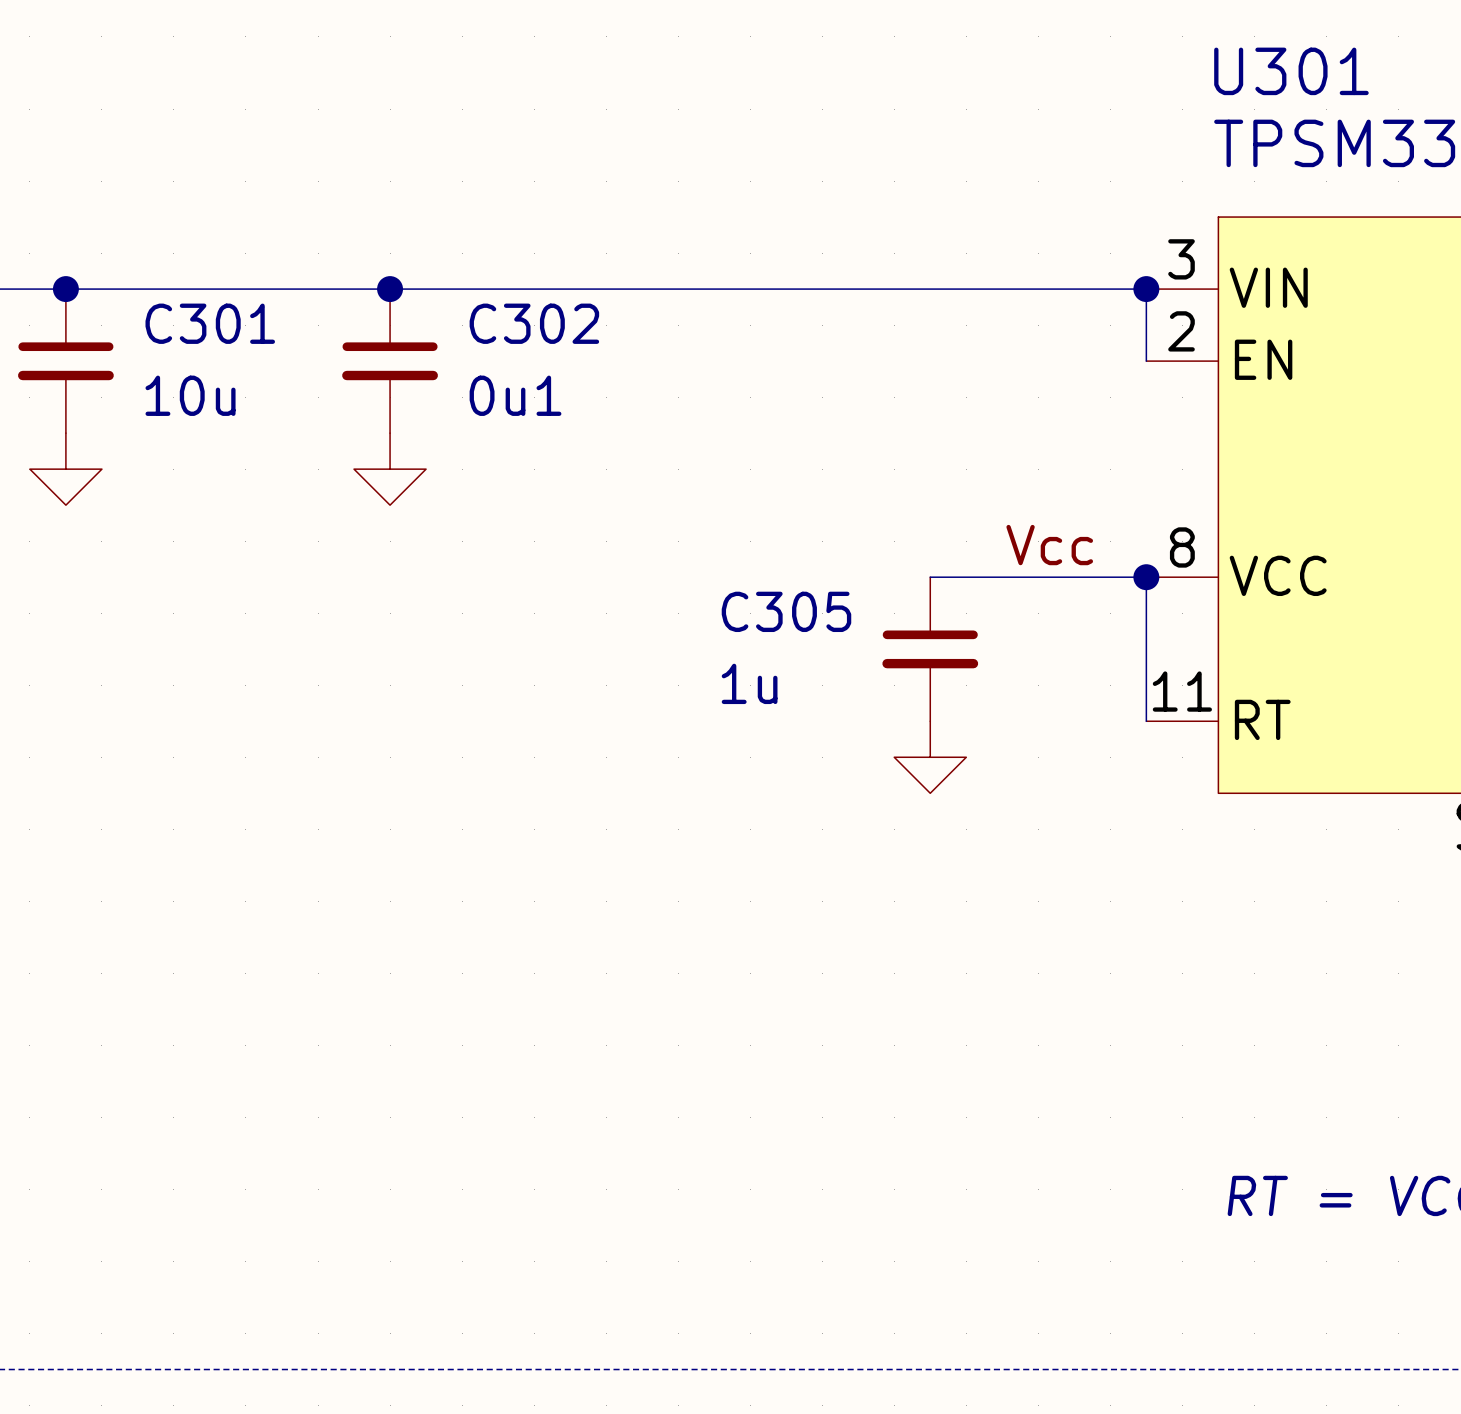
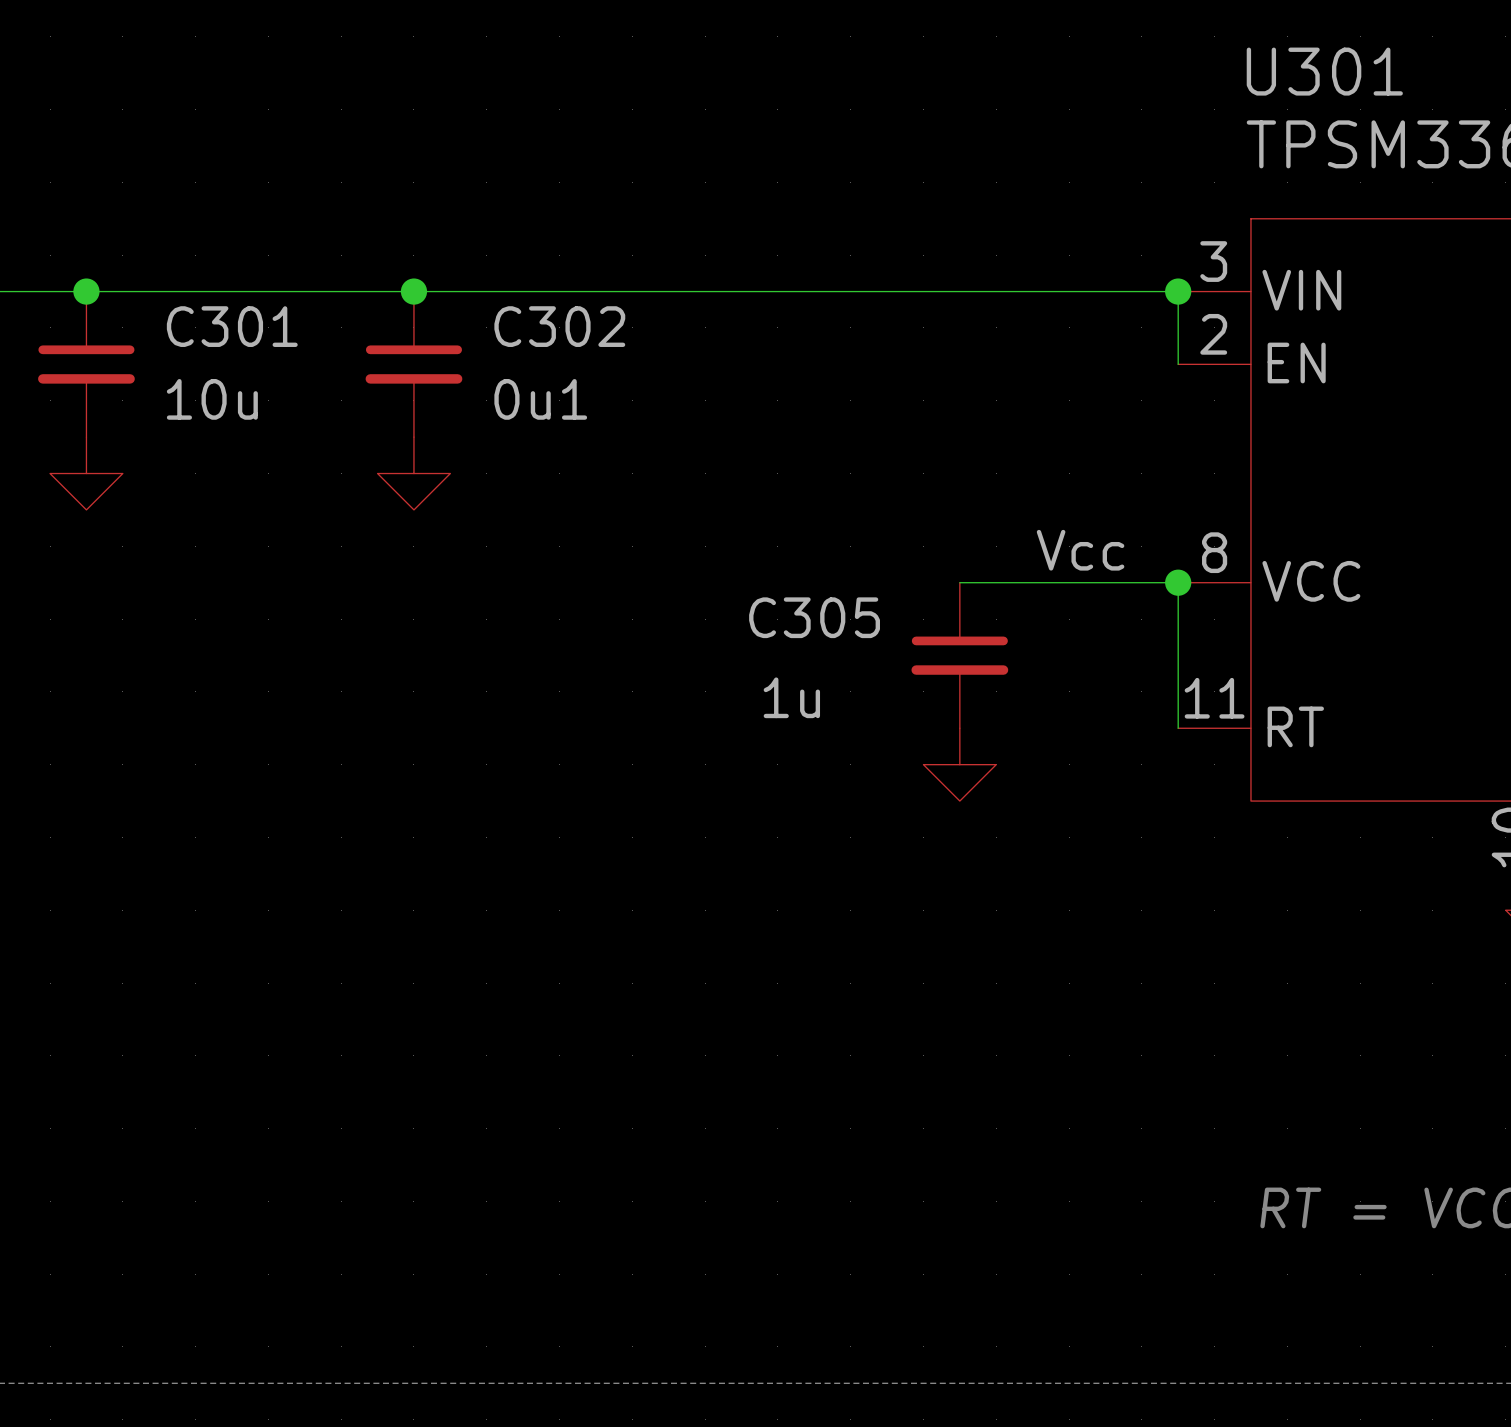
C305 value position: 1u (749, 683) -> 1u (791, 697)

